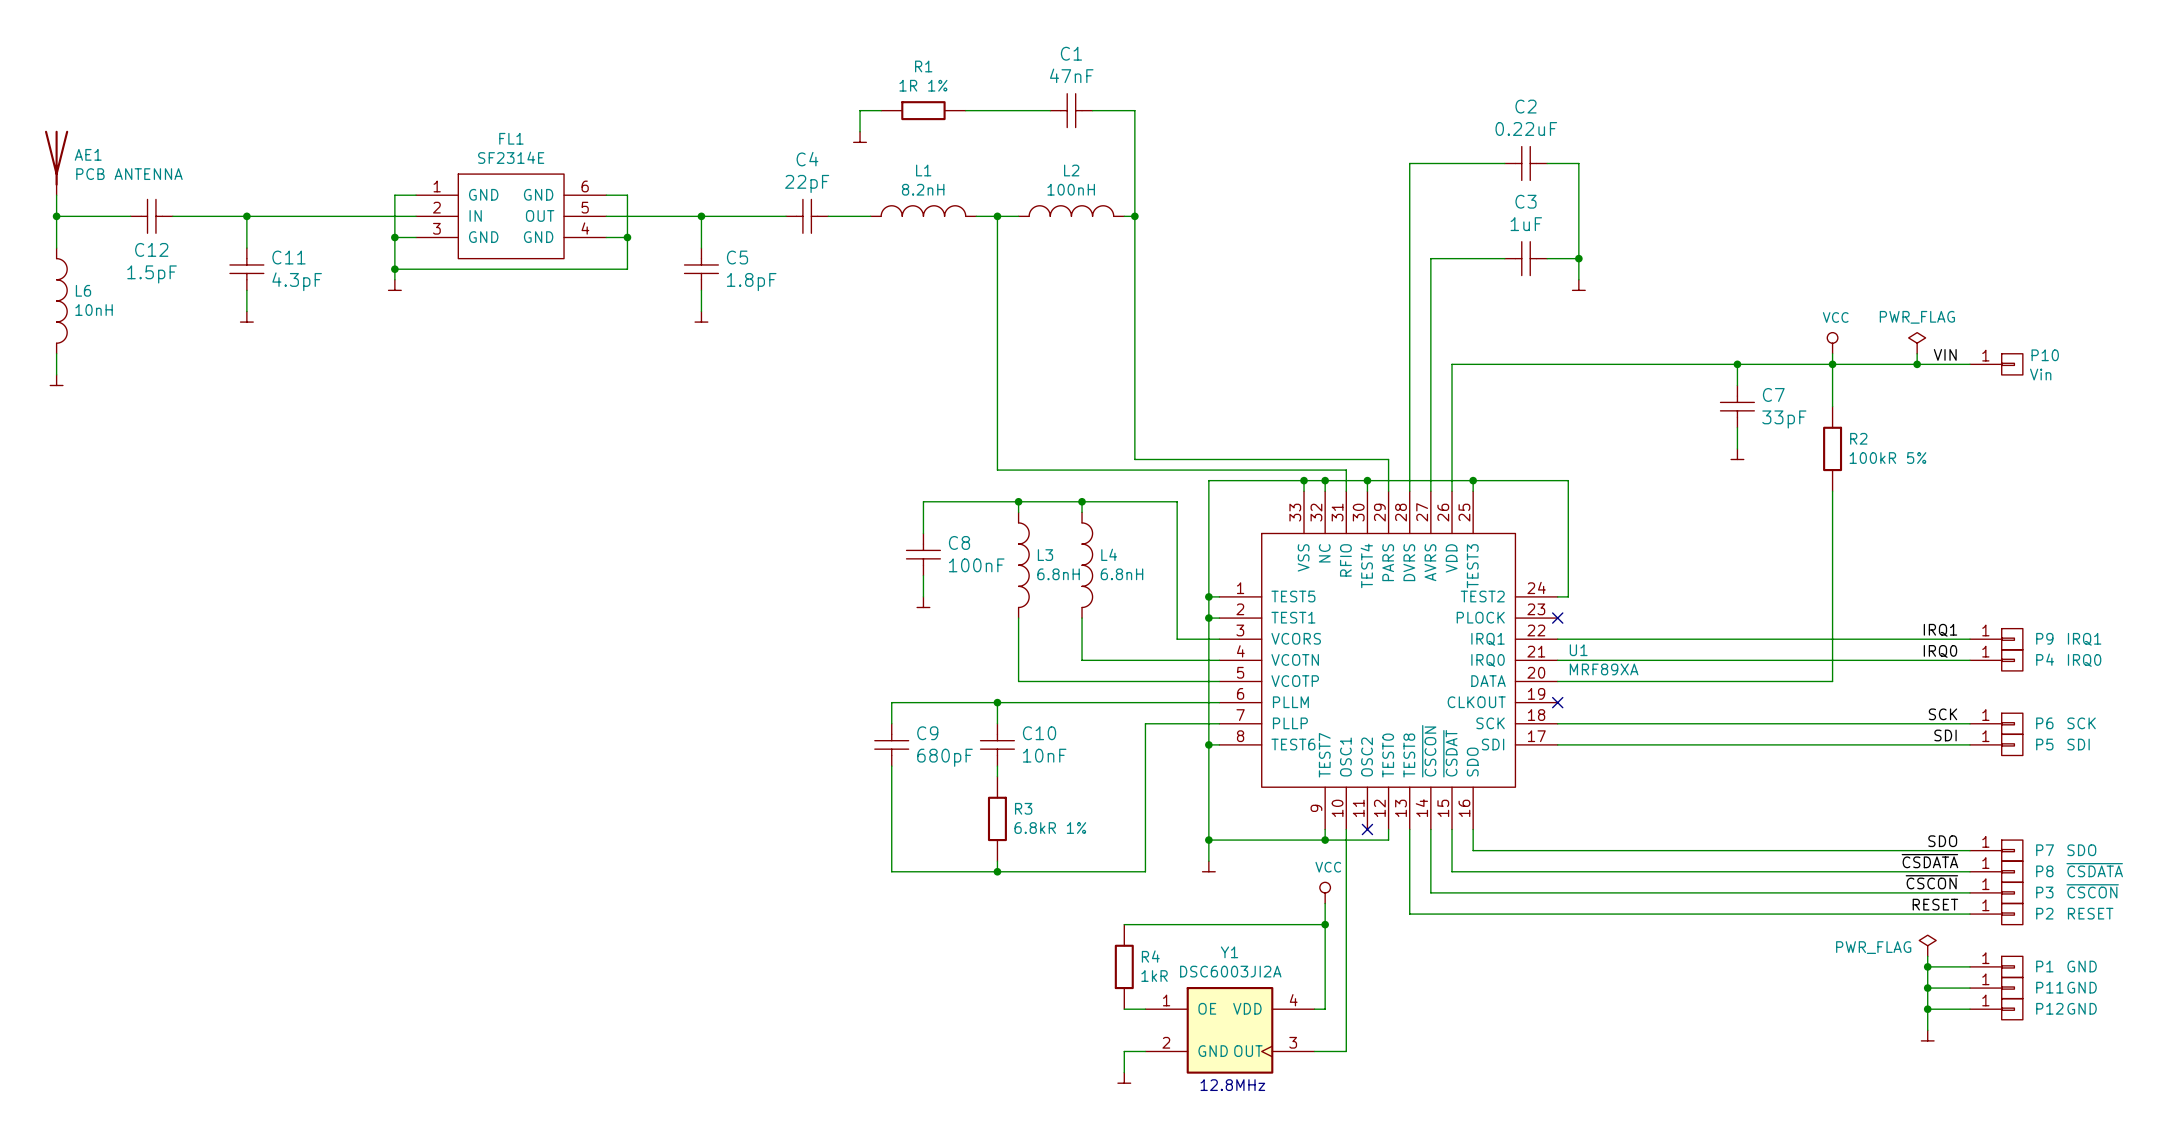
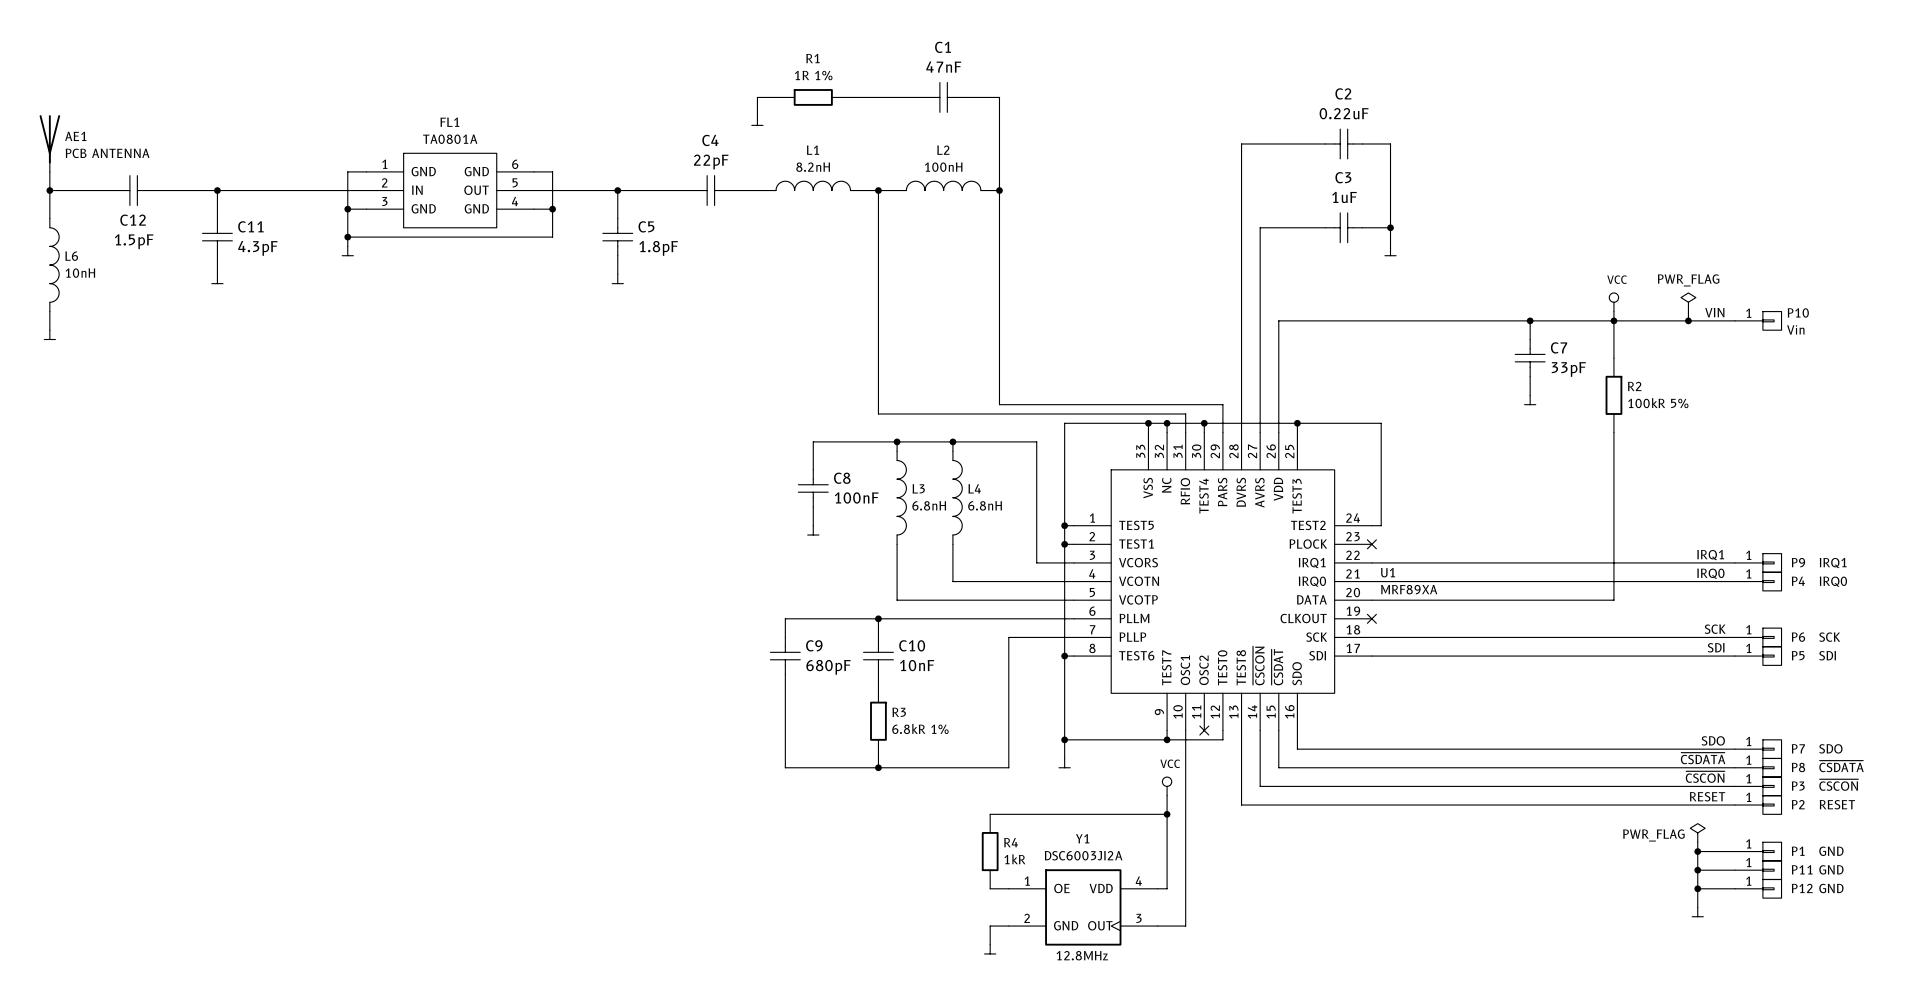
FL1 value: SF2314E (511, 157) -> TA0801A (450, 139)

